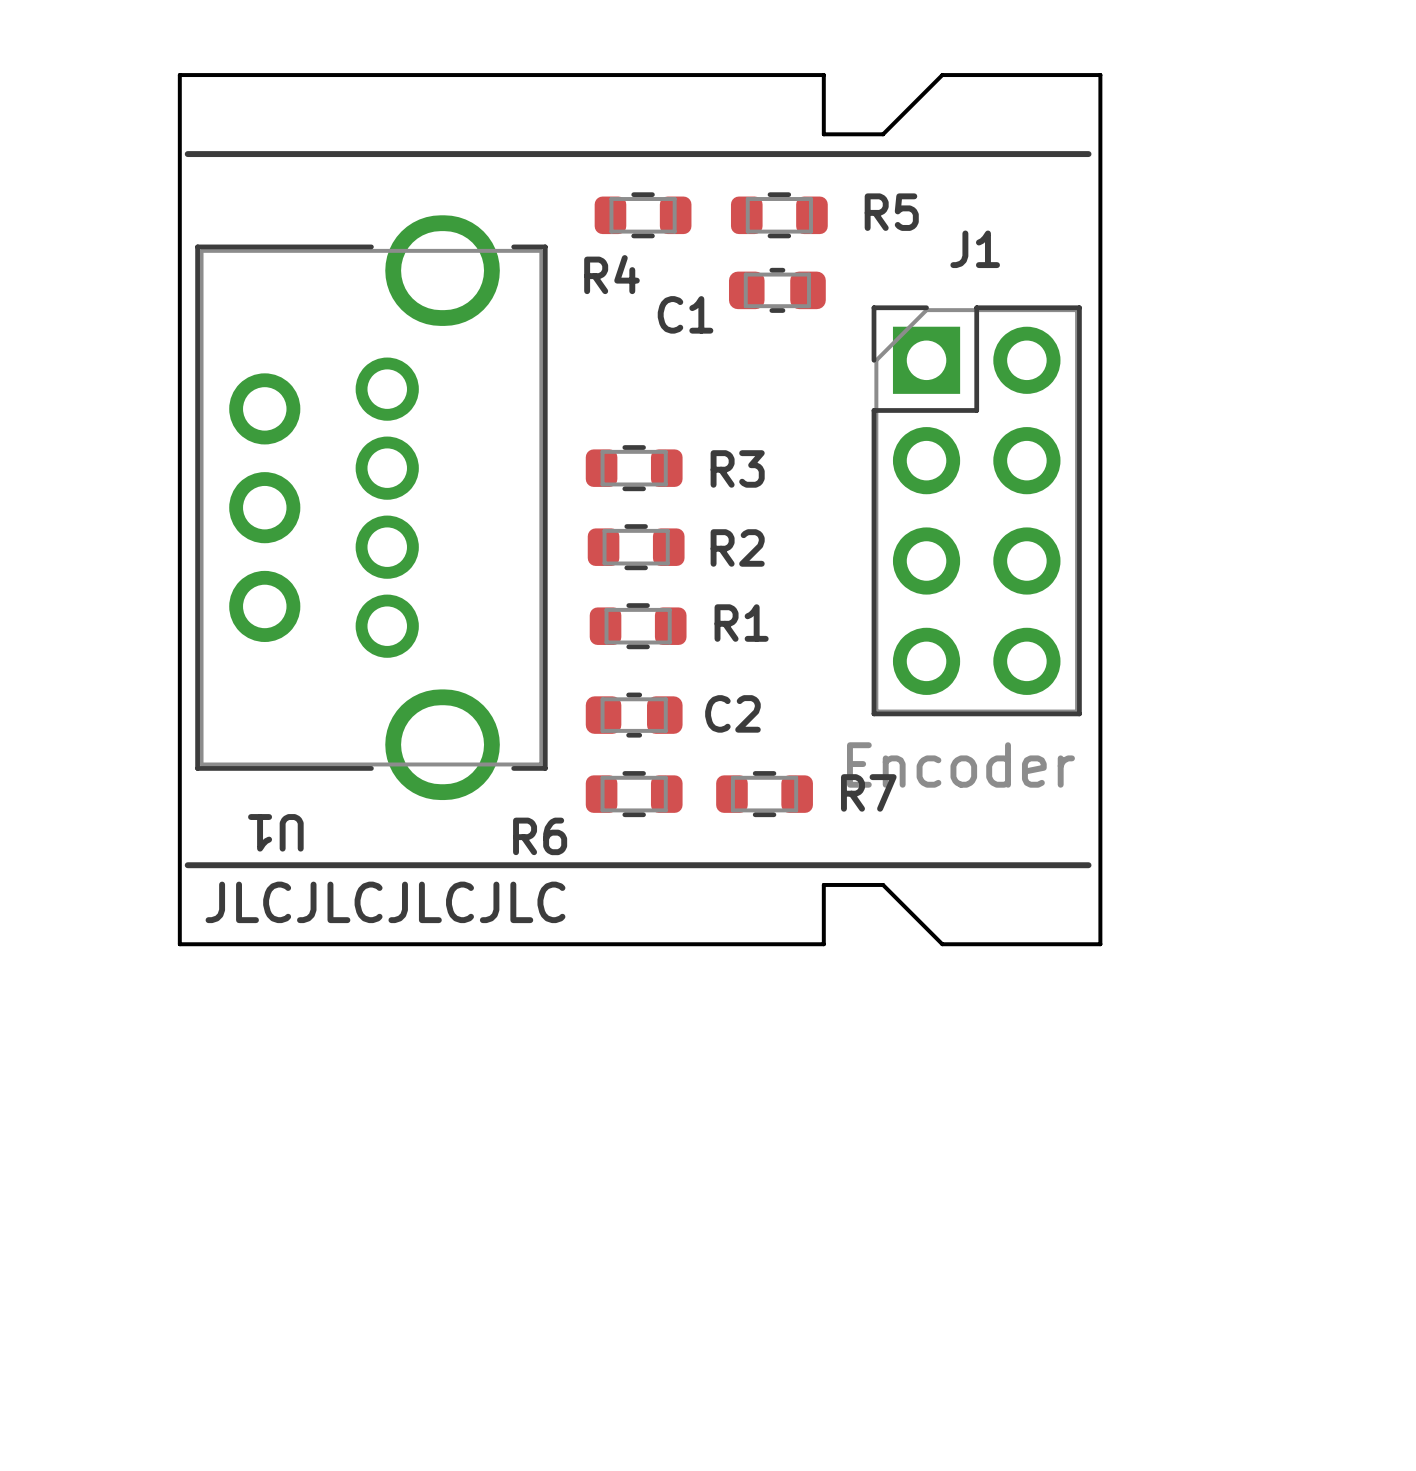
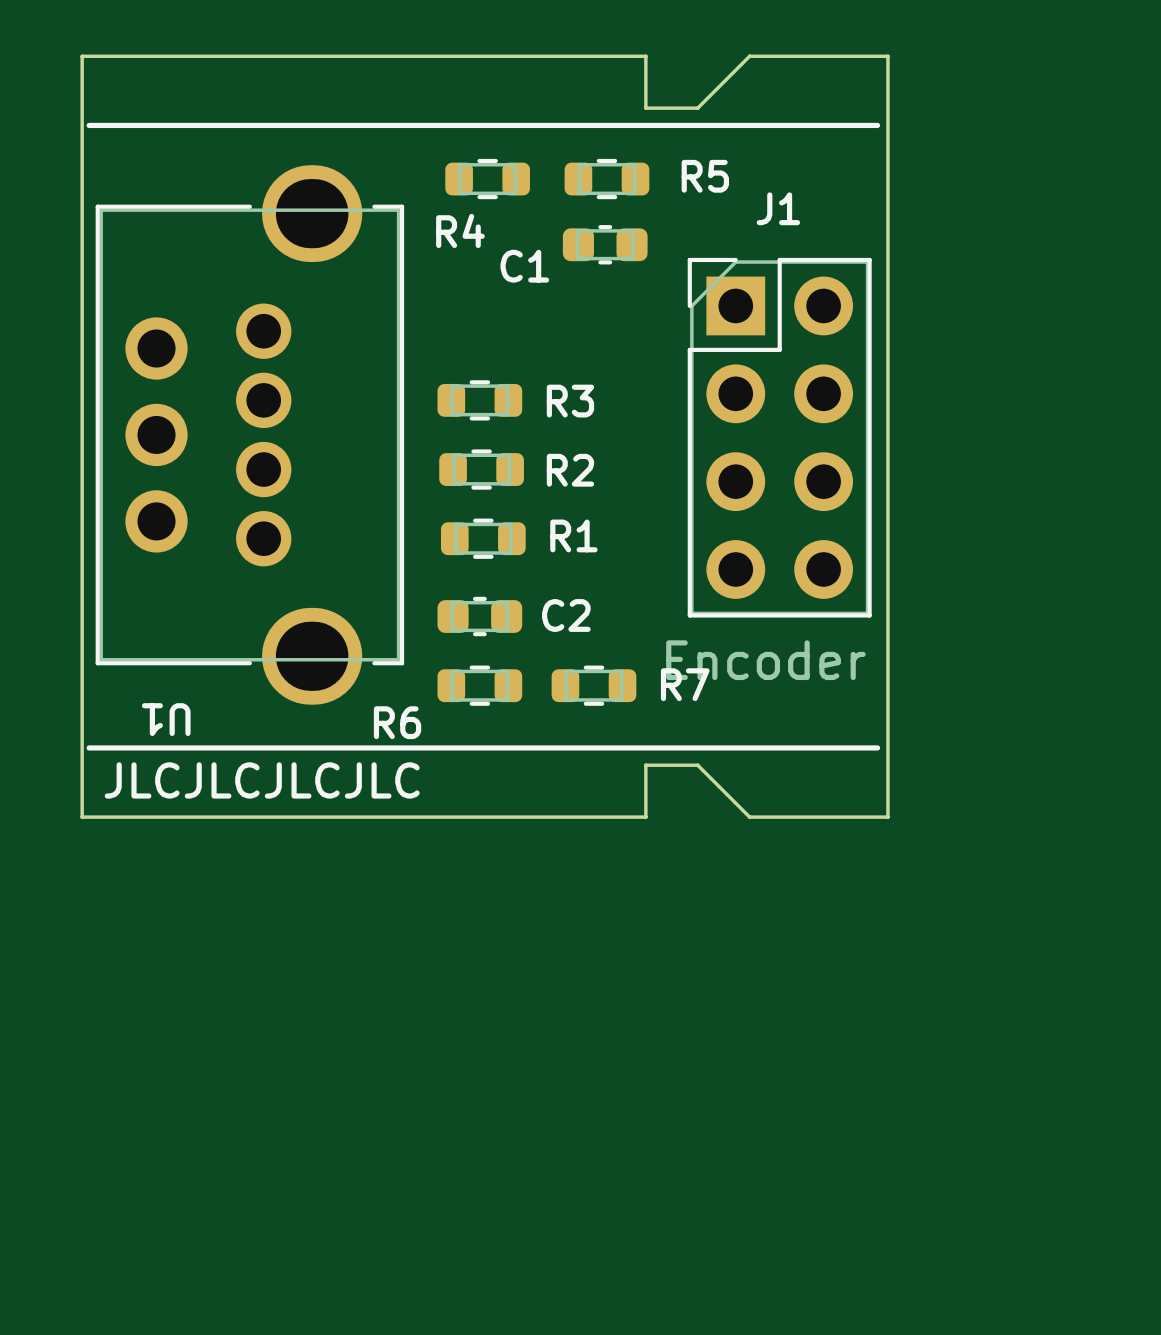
U1 footprint: [195, 215, 548, 801] -> [95, 165, 405, 705]

